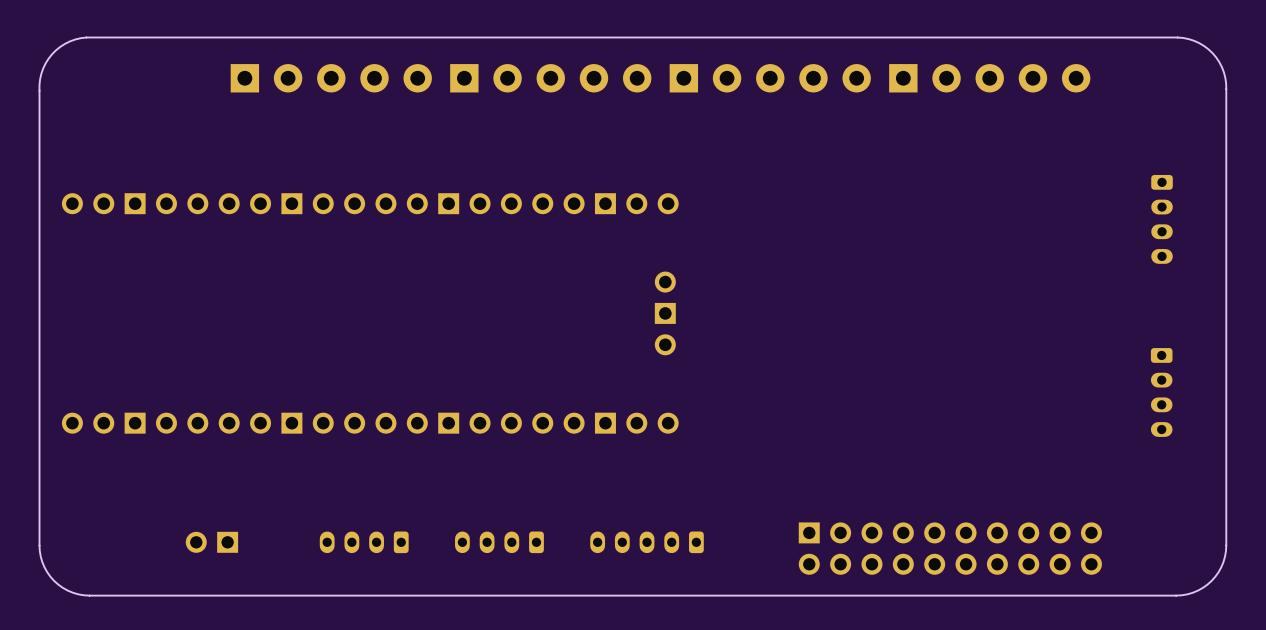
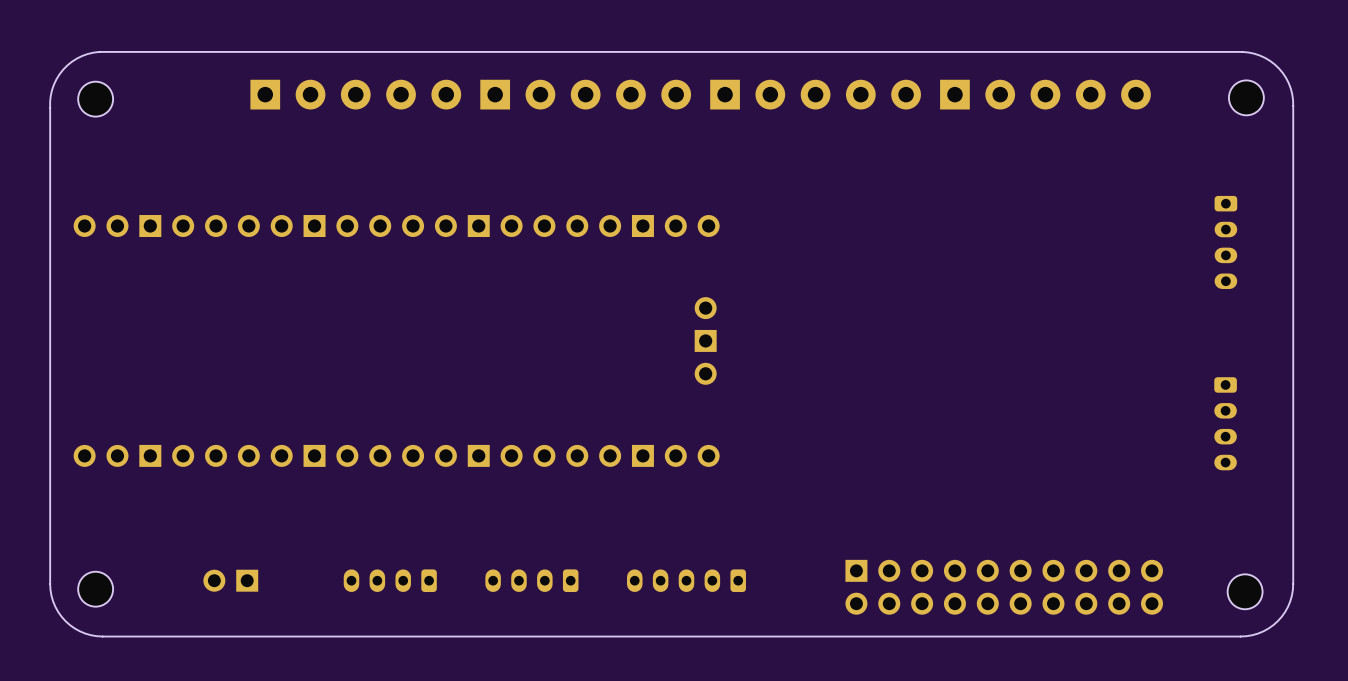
part: none -> (1246, 97)
part: none -> (95, 99)
part: none -> (95, 589)
part: none -> (1245, 591)

